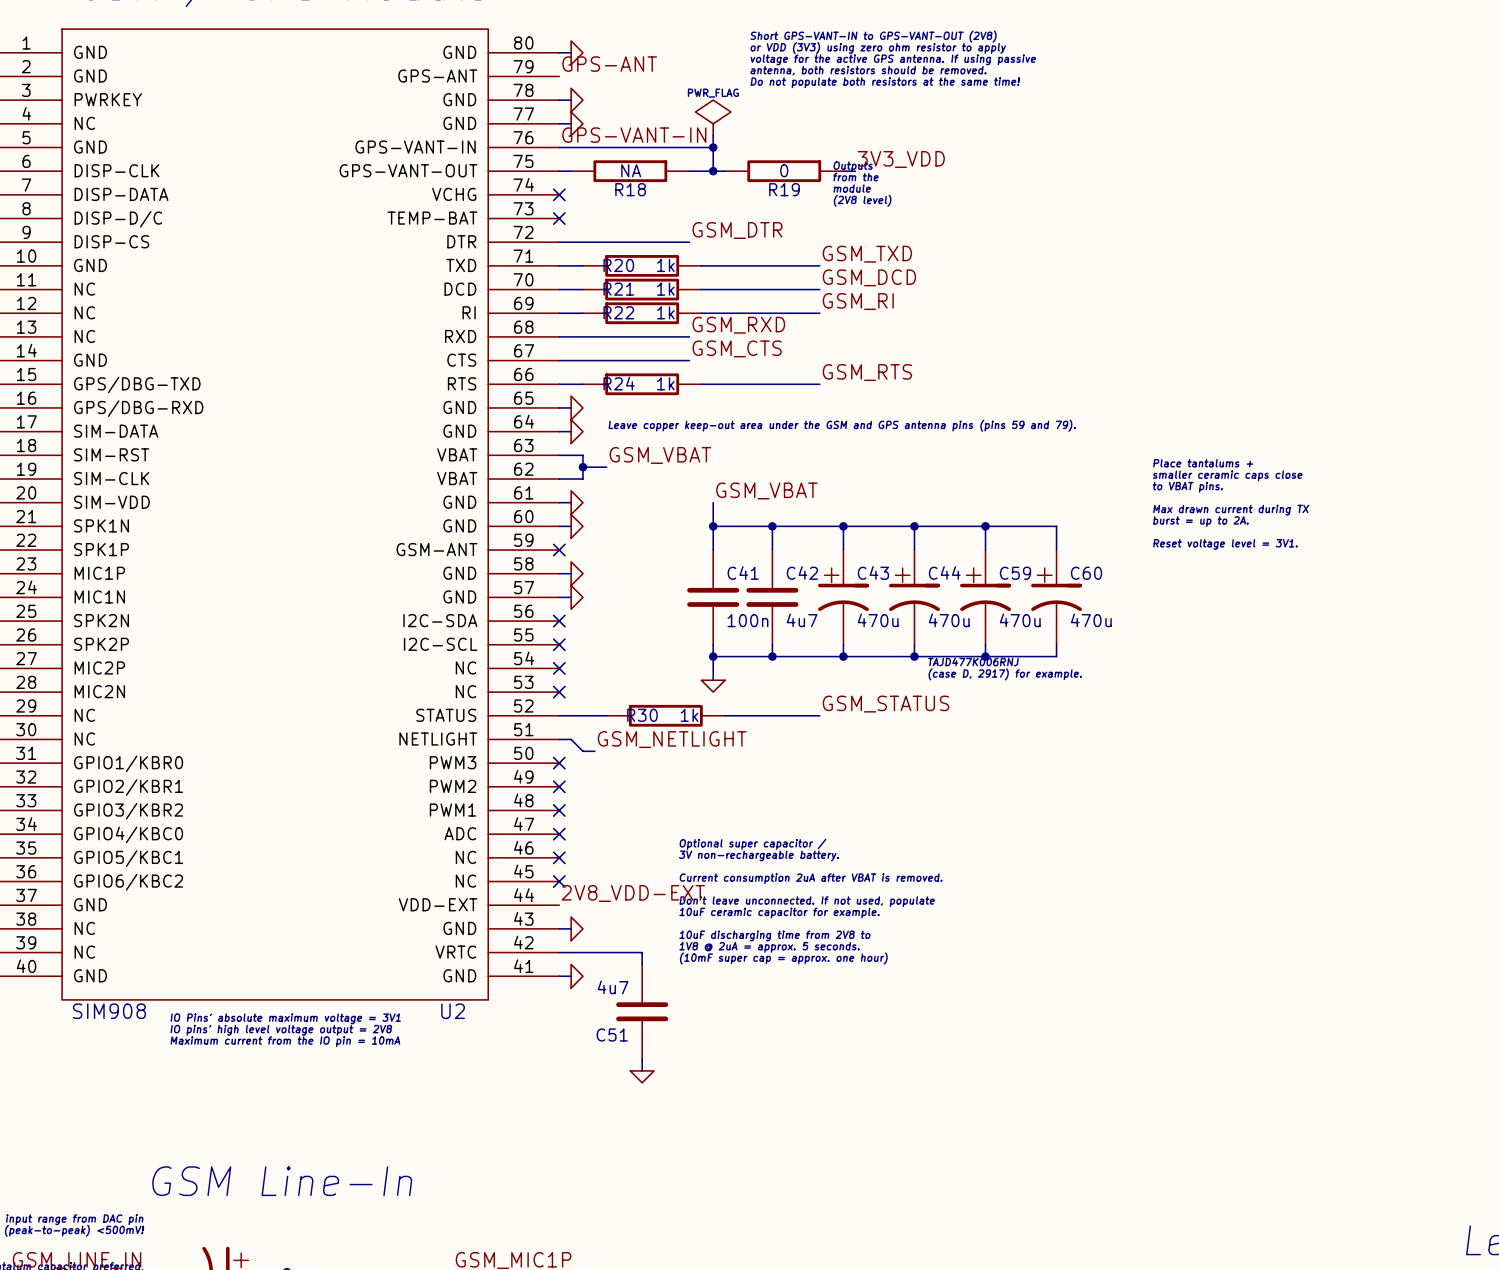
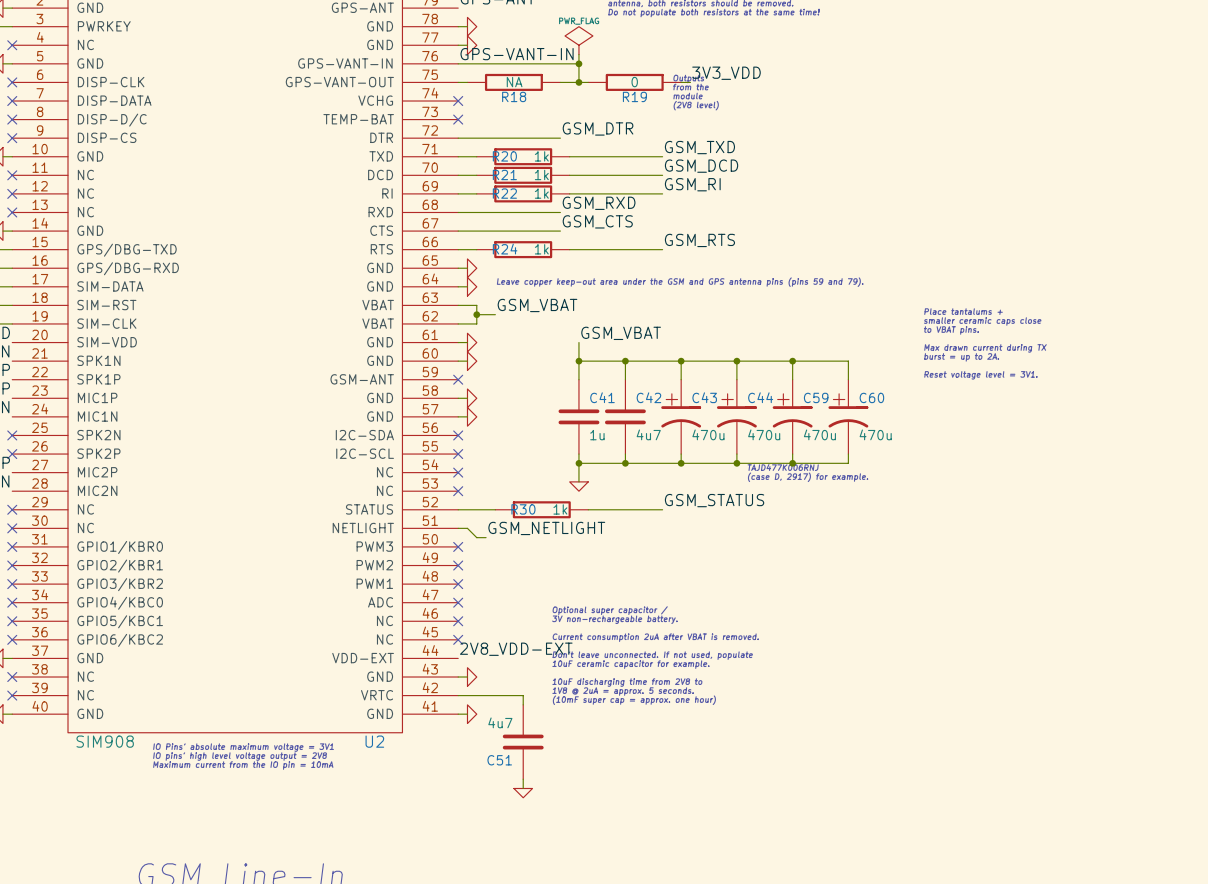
C41 value: 100n (747, 620) -> 1u (597, 435)

